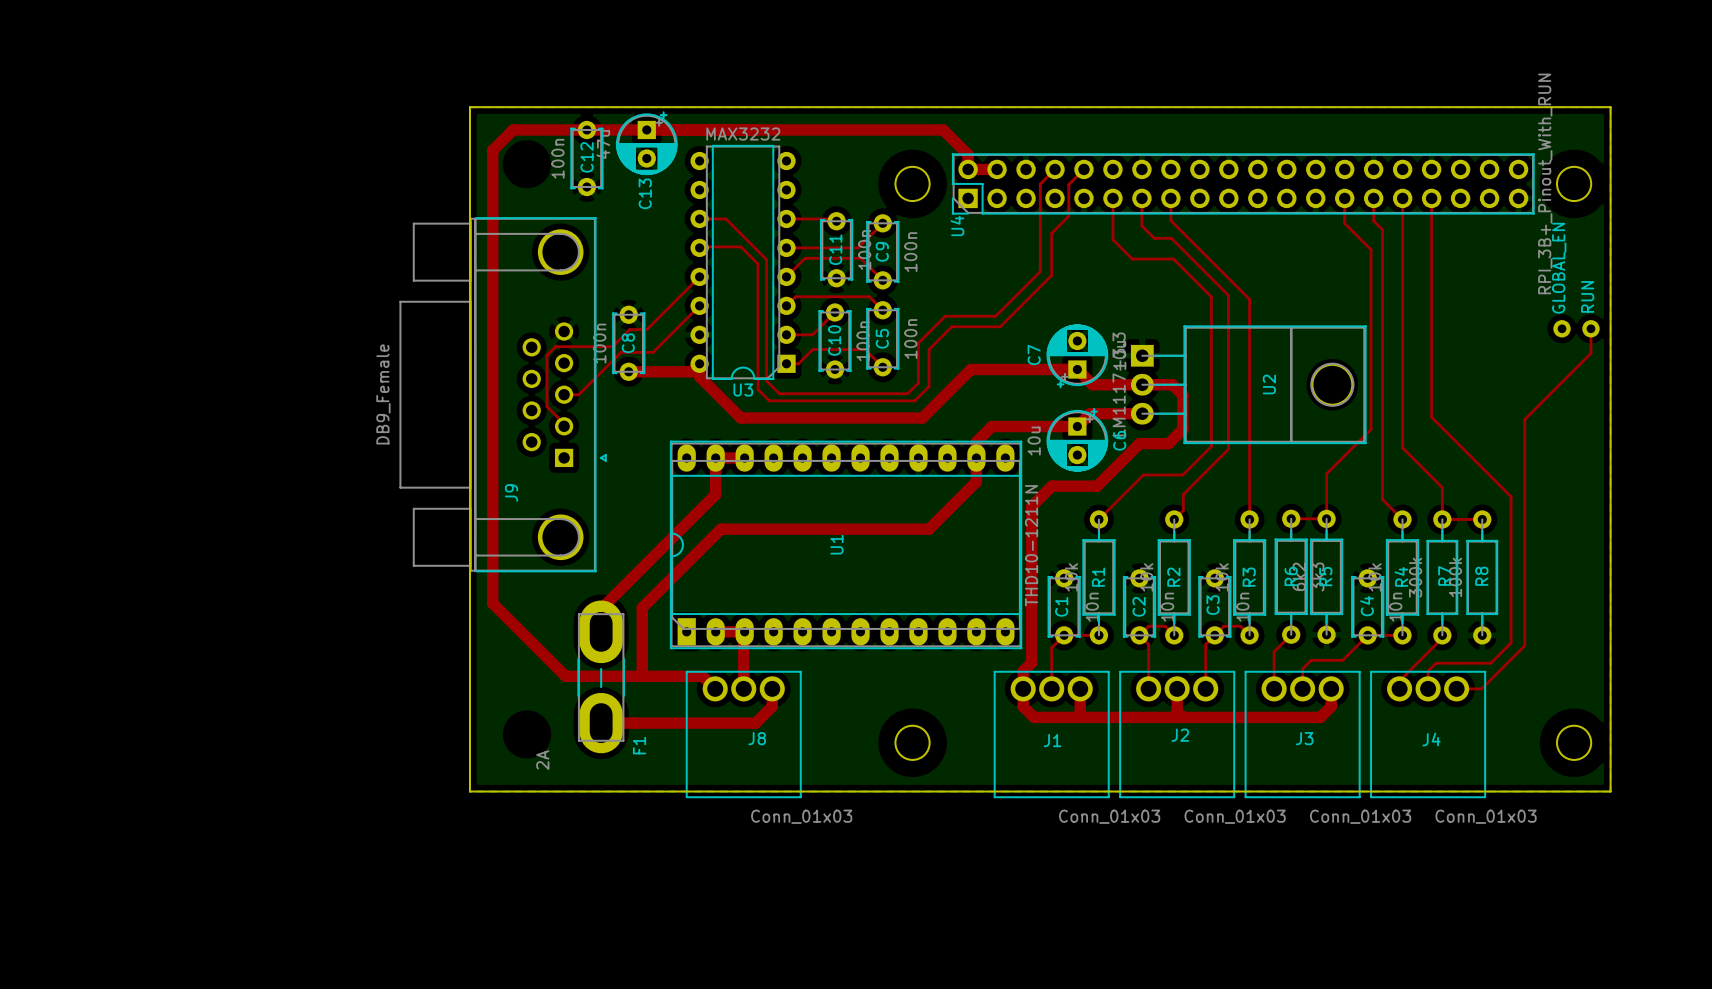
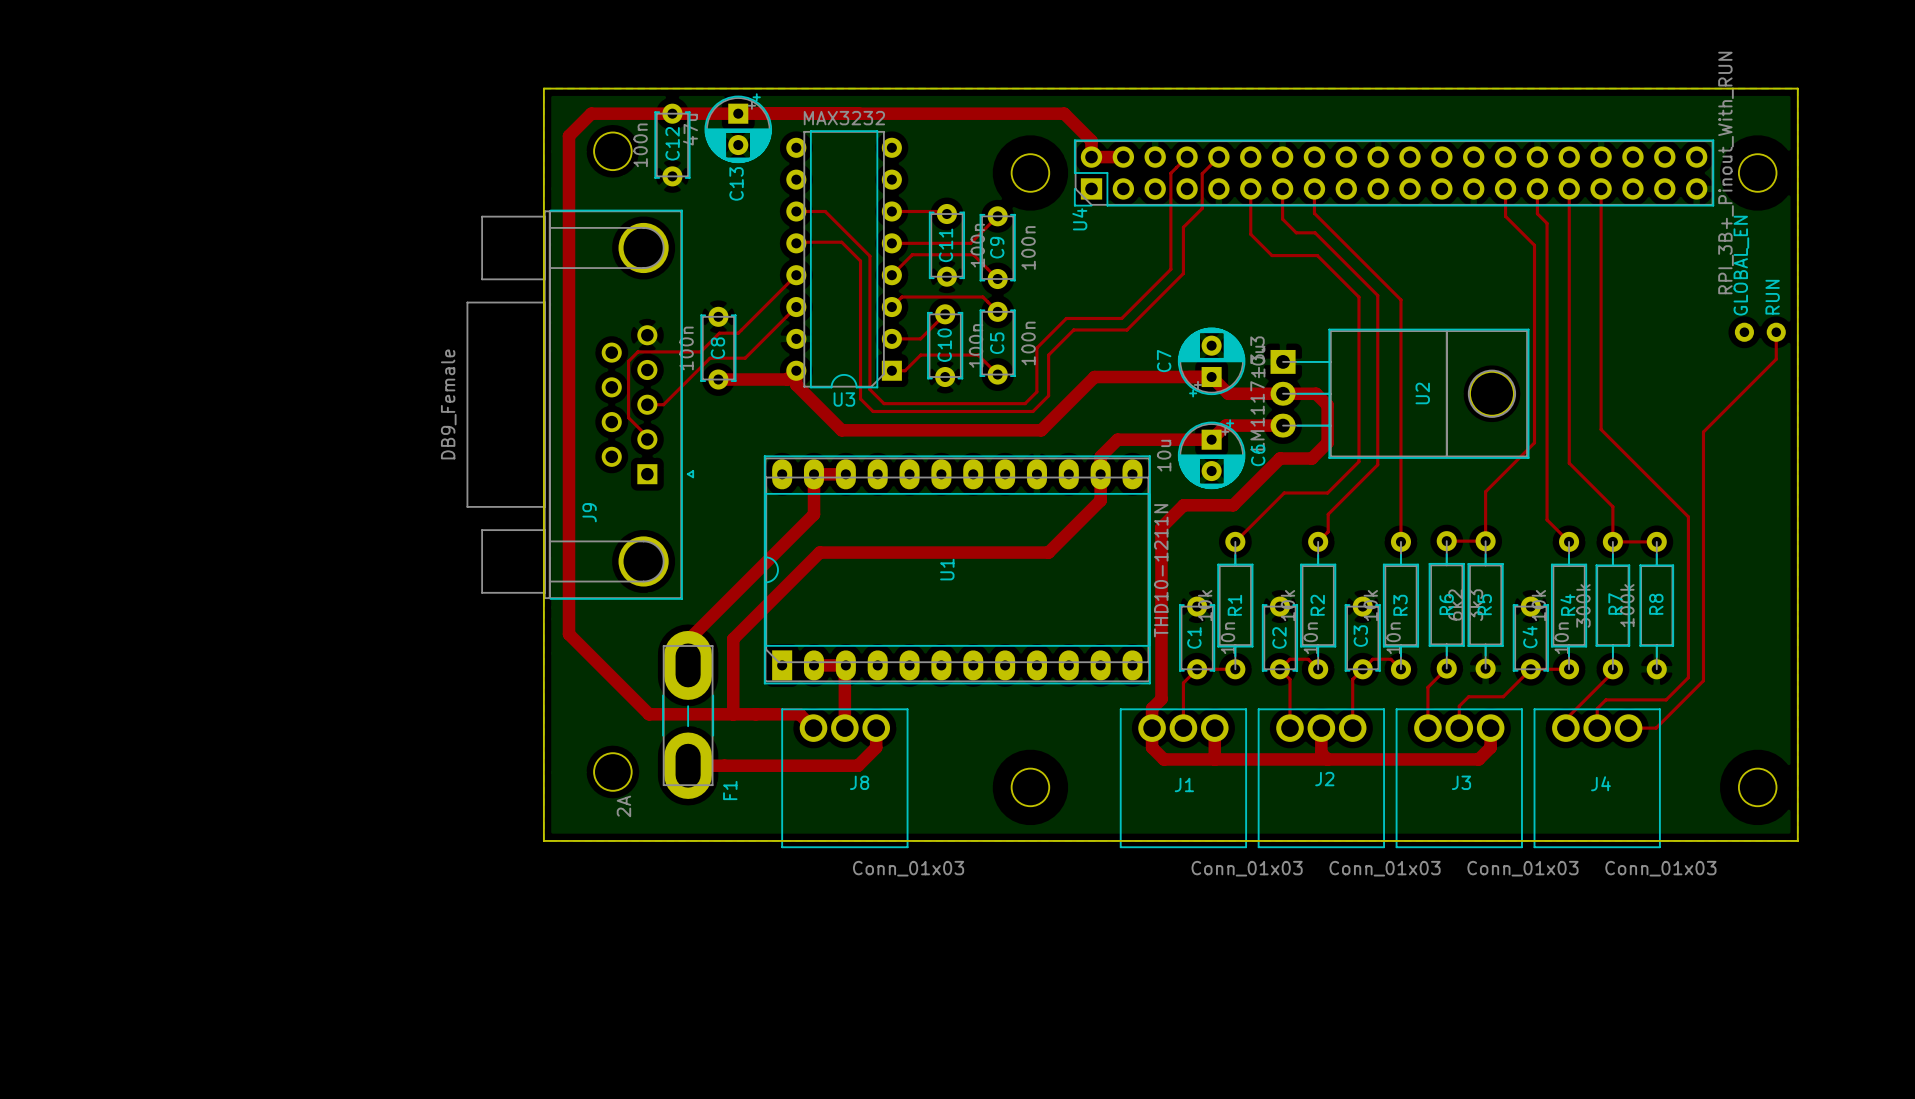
round board edge: none -> [593, 131, 633, 172]
round board edge: none -> [593, 752, 633, 792]

